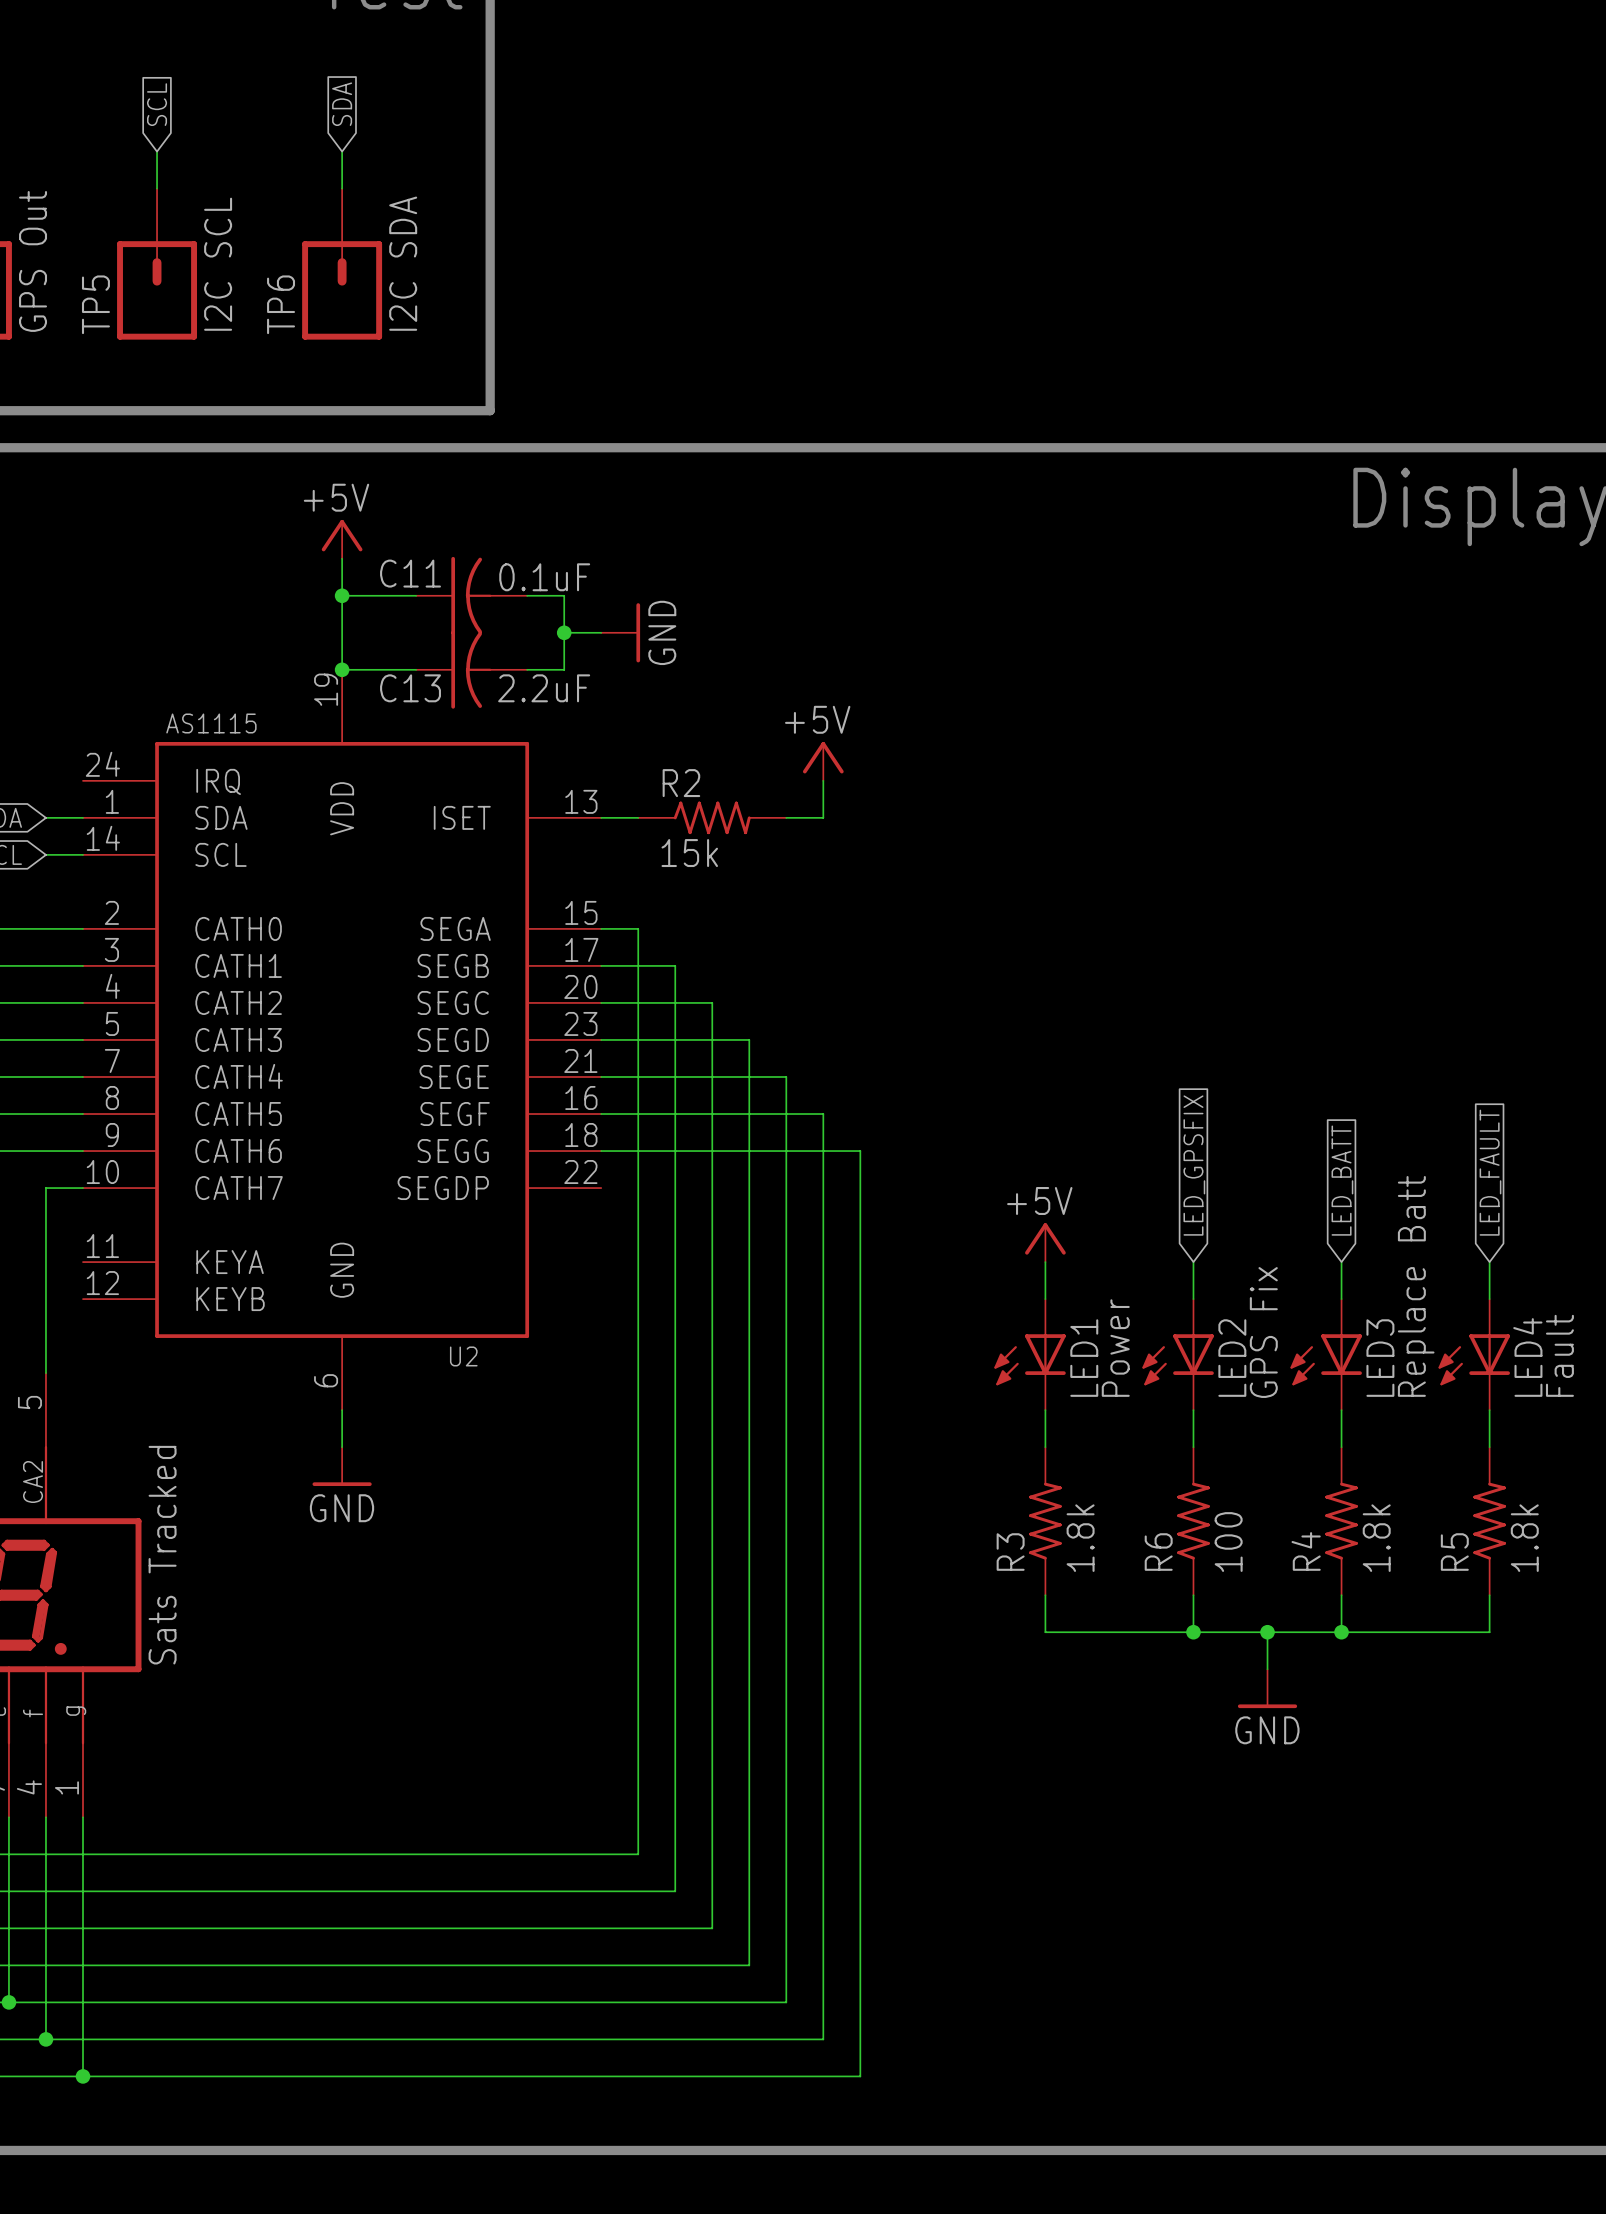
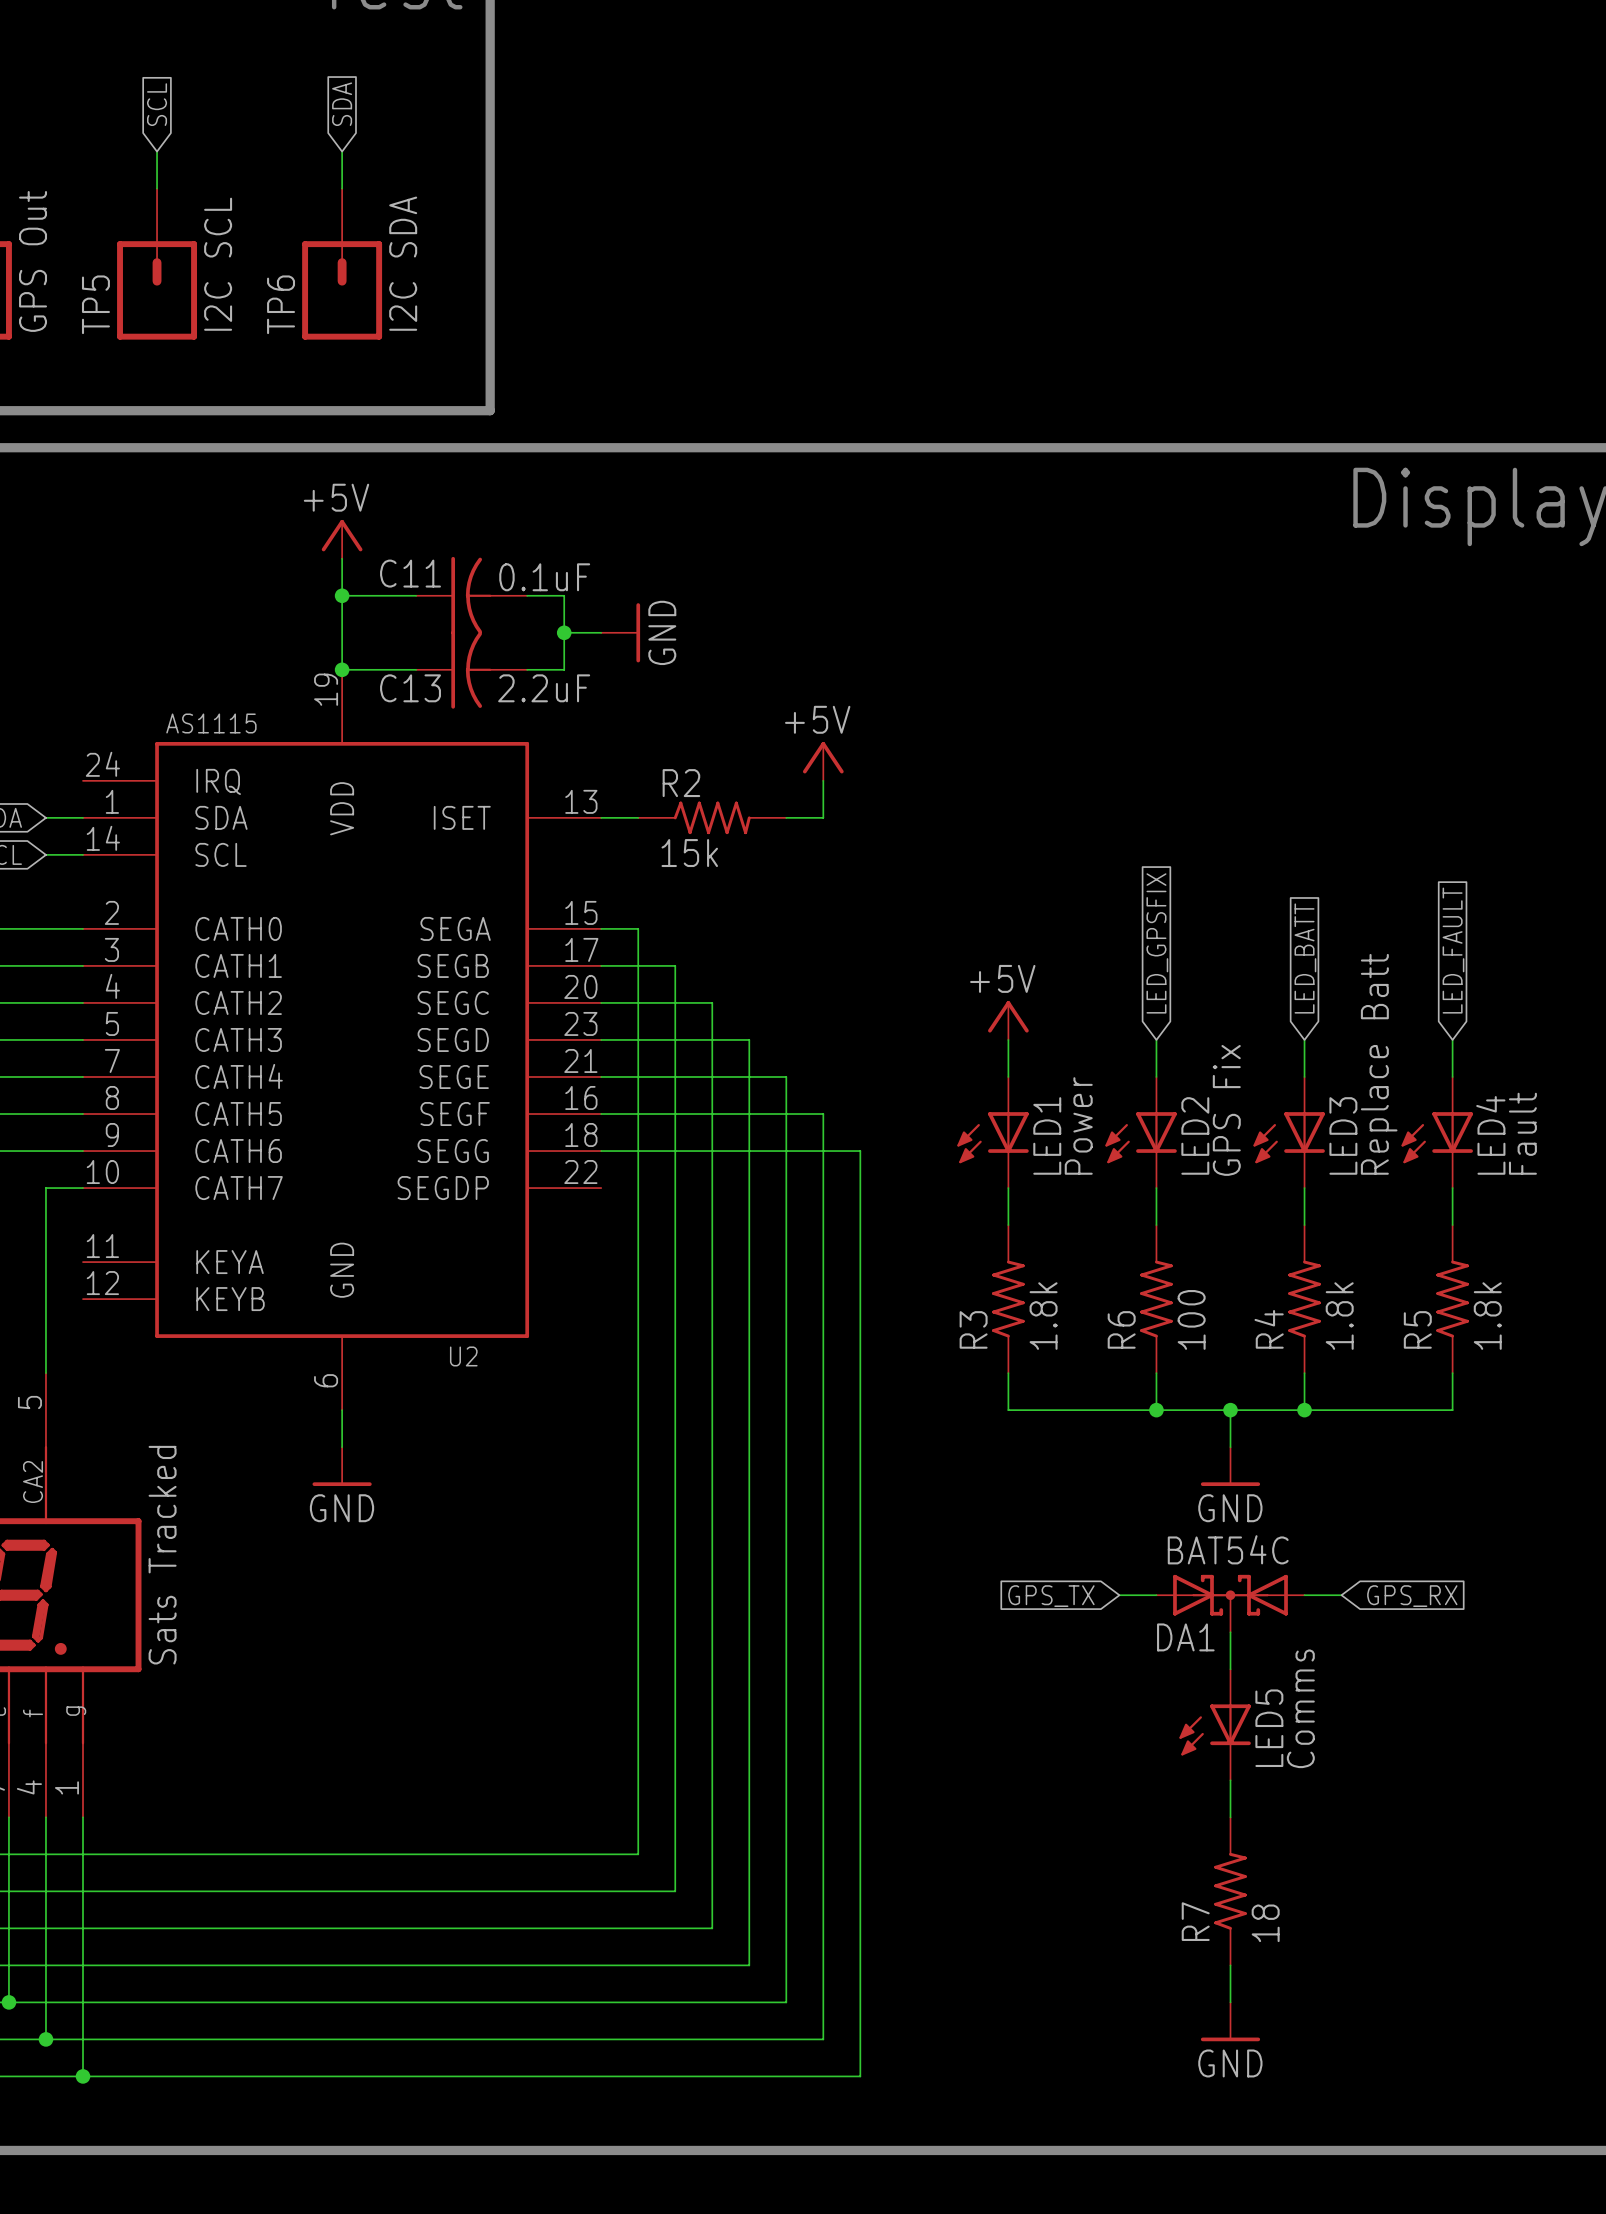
global label position: LED_GPSFIX (1194, 1165) -> LED_GPSFIX (1157, 943)
global label position: LED_FAULT (1490, 1172) -> LED_FAULT (1453, 950)
global label position: LED_BATT (1342, 1180) -> LED_BATT (1305, 958)
power symbol position: +5V (1045, 1242) -> +5V (1008, 1020)
wire: (1045, 1262) (1045, 1299) -> (1008, 1039) (1008, 1076)
wire: (1193, 1262) (1193, 1299) -> (1156, 1039) (1156, 1076)
wire: (1341, 1262) (1341, 1299) -> (1304, 1039) (1304, 1076)
wire: (1489, 1262) (1489, 1299) -> (1452, 1039) (1452, 1076)
LED1 position: (1030, 1354) -> (993, 1132)
LED2 position: (1178, 1354) -> (1141, 1132)
LED3 position: (1326, 1354) -> (1289, 1132)
LED4 position: (1474, 1354) -> (1437, 1132)
wire: none -> (1304, 1373) (1304, 1410)
wire: (1045, 1410) (1045, 1447) -> (1008, 1188) (1008, 1225)
junction: none -> (1156, 1410)
wire: (1193, 1410) (1193, 1447) -> (1156, 1188) (1156, 1225)
junction: none -> (1230, 1410)
junction: none -> (1304, 1410)
wire: (1341, 1410) (1341, 1447) -> (1304, 1188) (1304, 1225)
wire: (1489, 1410) (1489, 1447) -> (1452, 1188) (1452, 1225)
power symbol: none -> GND (1230, 1466)
R3 position: (1045, 1521) -> (1008, 1299)
R6 position: (1193, 1521) -> (1156, 1299)
R4 position: (1341, 1521) -> (1304, 1299)
R5 position: (1489, 1521) -> (1452, 1299)
wire: (1045, 1595) (1045, 1632) (1489, 1632) (1489, 1595) -> (1008, 1373) (1008, 1410) (1452, 1410) (1452, 1373)
wire: none -> (1119, 1595) (1156, 1595)
wire: (1193, 1595) (1193, 1632) -> (1156, 1373) (1156, 1410)
wire: (1341, 1595) (1341, 1632) -> (1341, 1595) (1304, 1595)
global label: none -> GPS_TX (1051, 1596)
global label: none -> GPS_RX (1412, 1596)
DA1: none -> BAT54C (1230, 1603)
junction: (1193, 1632) -> none
wire: none -> (1230, 1632) (1230, 1669)
wire: (1267, 1632) (1267, 1669) -> (1230, 1410) (1230, 1447)
junction: (1267, 1632) -> none
junction: (1341, 1632) -> none
power symbol: GND (1267, 1688) -> none
LED5: none -> Comms (1215, 1724)
wire: none -> (1230, 1780) (1230, 1817)
R7: none -> 18 (1230, 1891)
wire: none -> (1230, 1965) (1230, 2002)
power symbol: none -> GND (1230, 2021)

